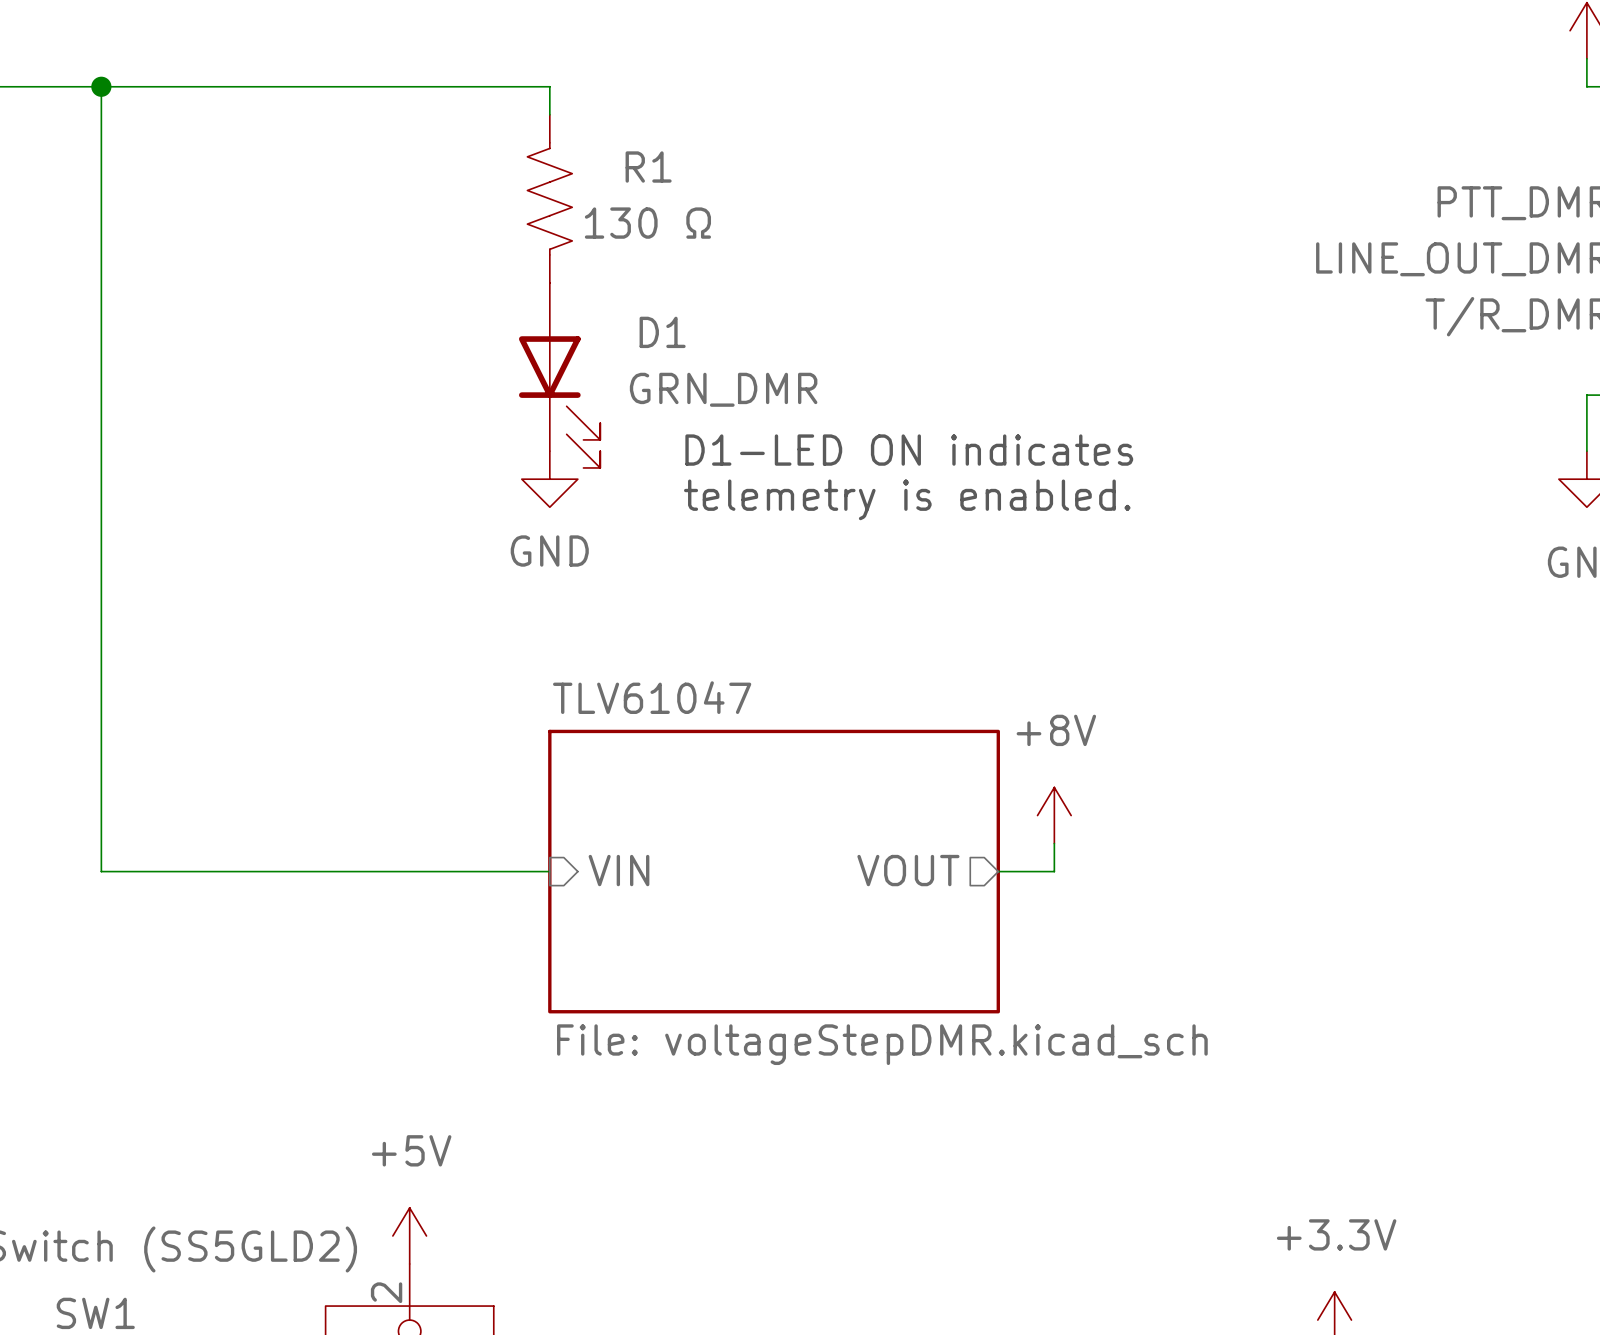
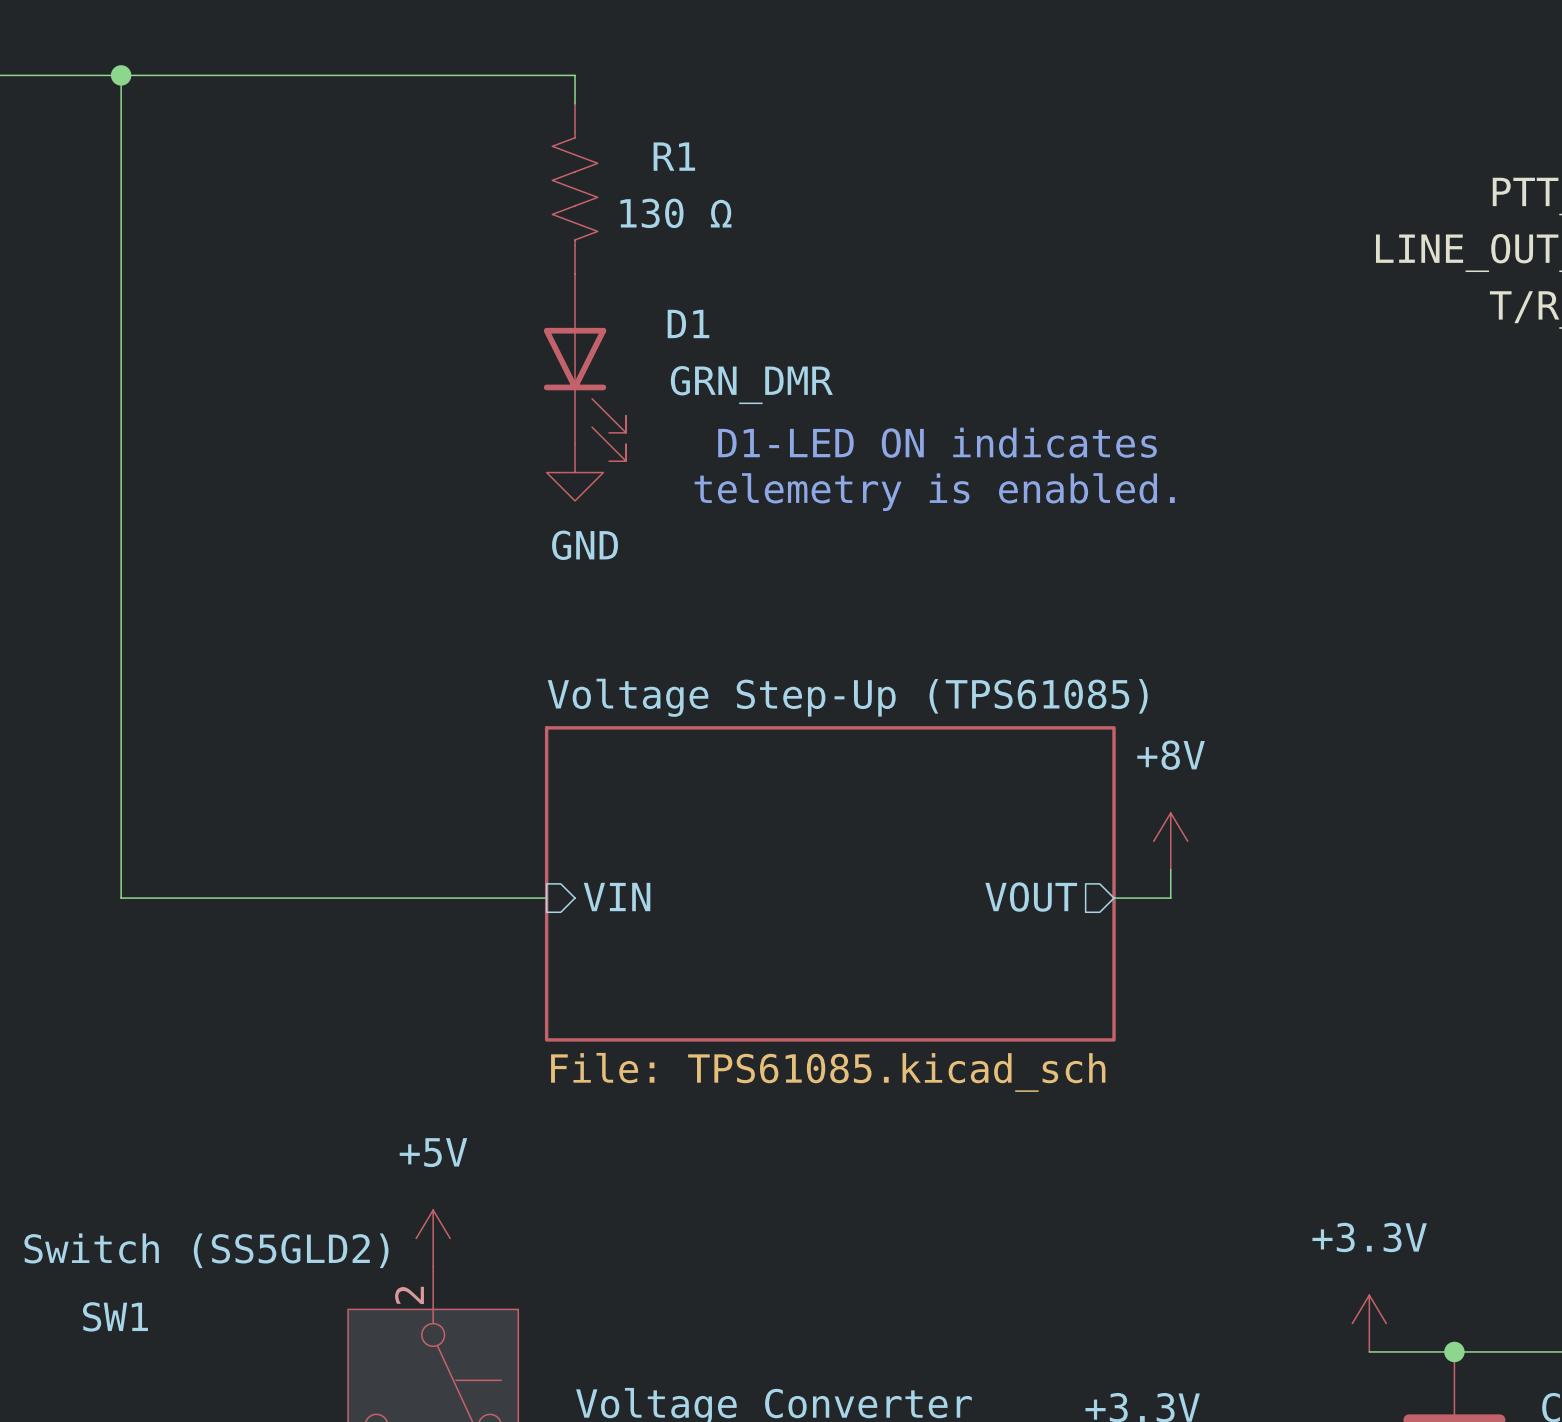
power symbol position: +8V (1054, 815) -> +8V (1170, 841)
wire: (1054, 843) (1054, 871) (998, 871) -> (1170, 869) (1170, 898) (1114, 898)
sheet pin position: VIN (619, 870) -> VIN (617, 897)
sheet pin position: VOUT (908, 870) -> VOUT (1031, 897)
wire: (101, 871) (549, 871) -> (121, 869) (121, 898) (546, 898)
sheet TLV61047: File: voltageStepDMR.kicad_sch (774, 871) -> none
sheet Voltage Step-Up (TPS61085): none -> File: TPS61085.kicad_sch (830, 883)

